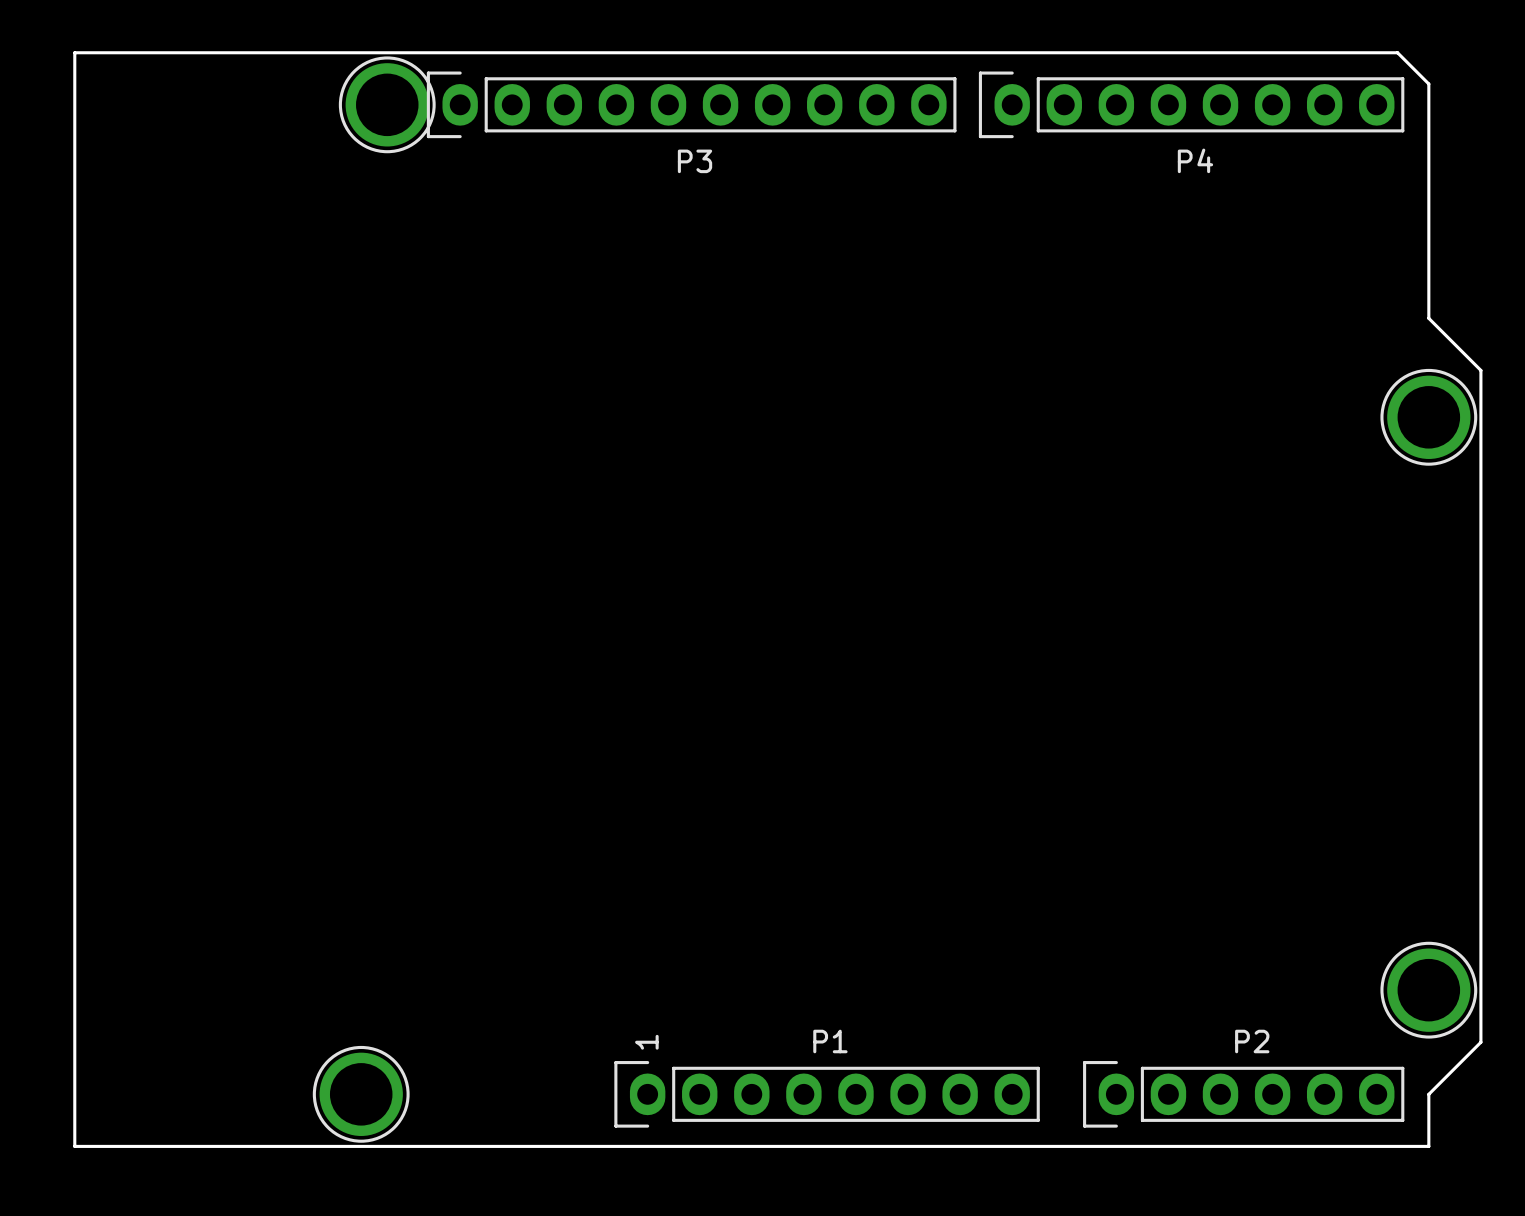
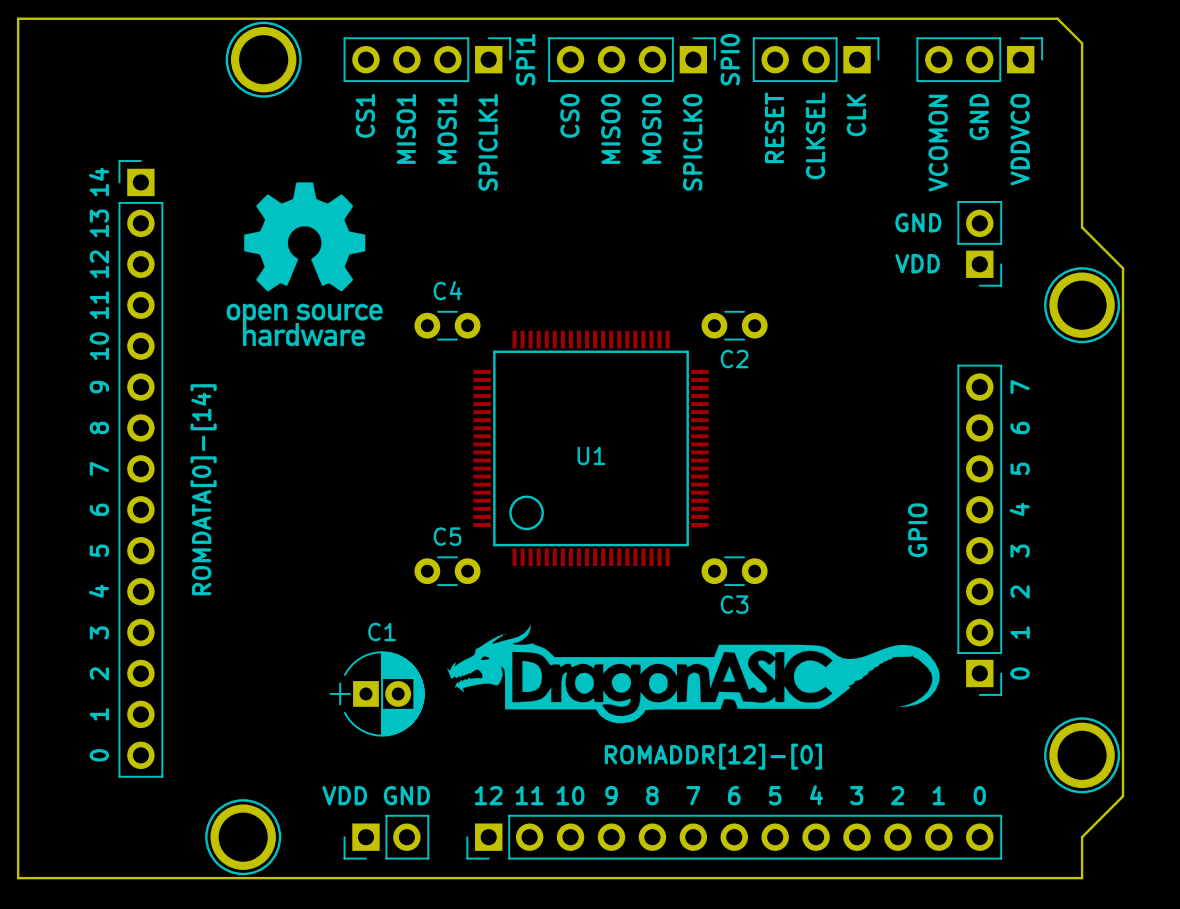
SPI1: none -> (427, 59)
P3: (691, 104) -> none
SPI0: none -> (631, 59)
part: none -> (816, 59)
P4: (1191, 104) -> none
part: none -> (979, 59)
text: none -> CLK (856, 115)
text: none -> CS1 (365, 115)
text: none -> CS0 (569, 115)
text: none -> GND (979, 117)
text: none -> RESET (774, 127)
text: none -> MISO1 (406, 128)
text: none -> MOSI1 (447, 128)
text: none -> MISO0 (610, 128)
text: none -> MOSI0 (651, 128)
text: none -> CLKSEL (815, 135)
text: none -> VDDVCO (1020, 139)
text: none -> SPICLK1 (488, 142)
text: none -> SPICLK0 (692, 142)
text: none -> VCOMON (938, 143)
text: none -> 14 (98, 182)
drawing: none -> [226, 182, 383, 347]
text: none -> GND (918, 222)
text: none -> 13 (99, 223)
part: none -> (979, 243)
text: none -> VDD (917, 263)
text: none -> 12 (99, 264)
text: none -> 11 (99, 305)
C4: none -> (447, 325)
C2: none -> (734, 325)
text: none -> 10 (99, 346)
text: none -> 9 (99, 387)
text: none -> 7 (1020, 387)
text: none -> 8 (99, 427)
text: none -> 6 (1020, 427)
U1: none -> (591, 448)
text: none -> 7 (99, 468)
part: none -> (140, 468)
text: none -> 5 (1020, 468)
text: none -> ROMDATA[0]-[14] (203, 489)
text: none -> 6 (99, 509)
text: none -> 4 (1019, 509)
text: none -> GPIO (917, 530)
part: none -> (979, 530)
text: none -> 5 (99, 550)
text: none -> 3 (1020, 551)
C5: none -> (447, 571)
C3: none -> (734, 571)
text: none -> 4 (98, 591)
text: none -> 2 (1020, 592)
drawing: none -> [446, 624, 940, 724]
text: none -> 1 (1020, 632)
text: none -> 3 (99, 632)
text: none -> 2 (99, 673)
text: none -> 0 (1020, 673)
C1: none -> (377, 693)
text: none -> 1 (99, 714)
text: none -> 0 (99, 755)
text: none -> ROMADDR[12]-[0] (713, 756)
text: none -> VDD (344, 795)
text: none -> GND (406, 795)
text: none -> 11 (529, 795)
text: none -> 10 (570, 795)
text: none -> 9 (611, 795)
text: none -> 8 (652, 795)
text: none -> 7 (693, 795)
text: none -> 6 (734, 795)
text: none -> 5 (775, 795)
text: none -> 4 (816, 795)
text: none -> 3 (856, 795)
text: none -> 2 (897, 795)
text: none -> 1 (938, 795)
text: none -> 0 (979, 795)
text: 1 (646, 1042) -> 12 (488, 795)
part: none -> (386, 837)
P1: (827, 1094) -> none
part: none -> (734, 837)
P2: (1243, 1094) -> none

